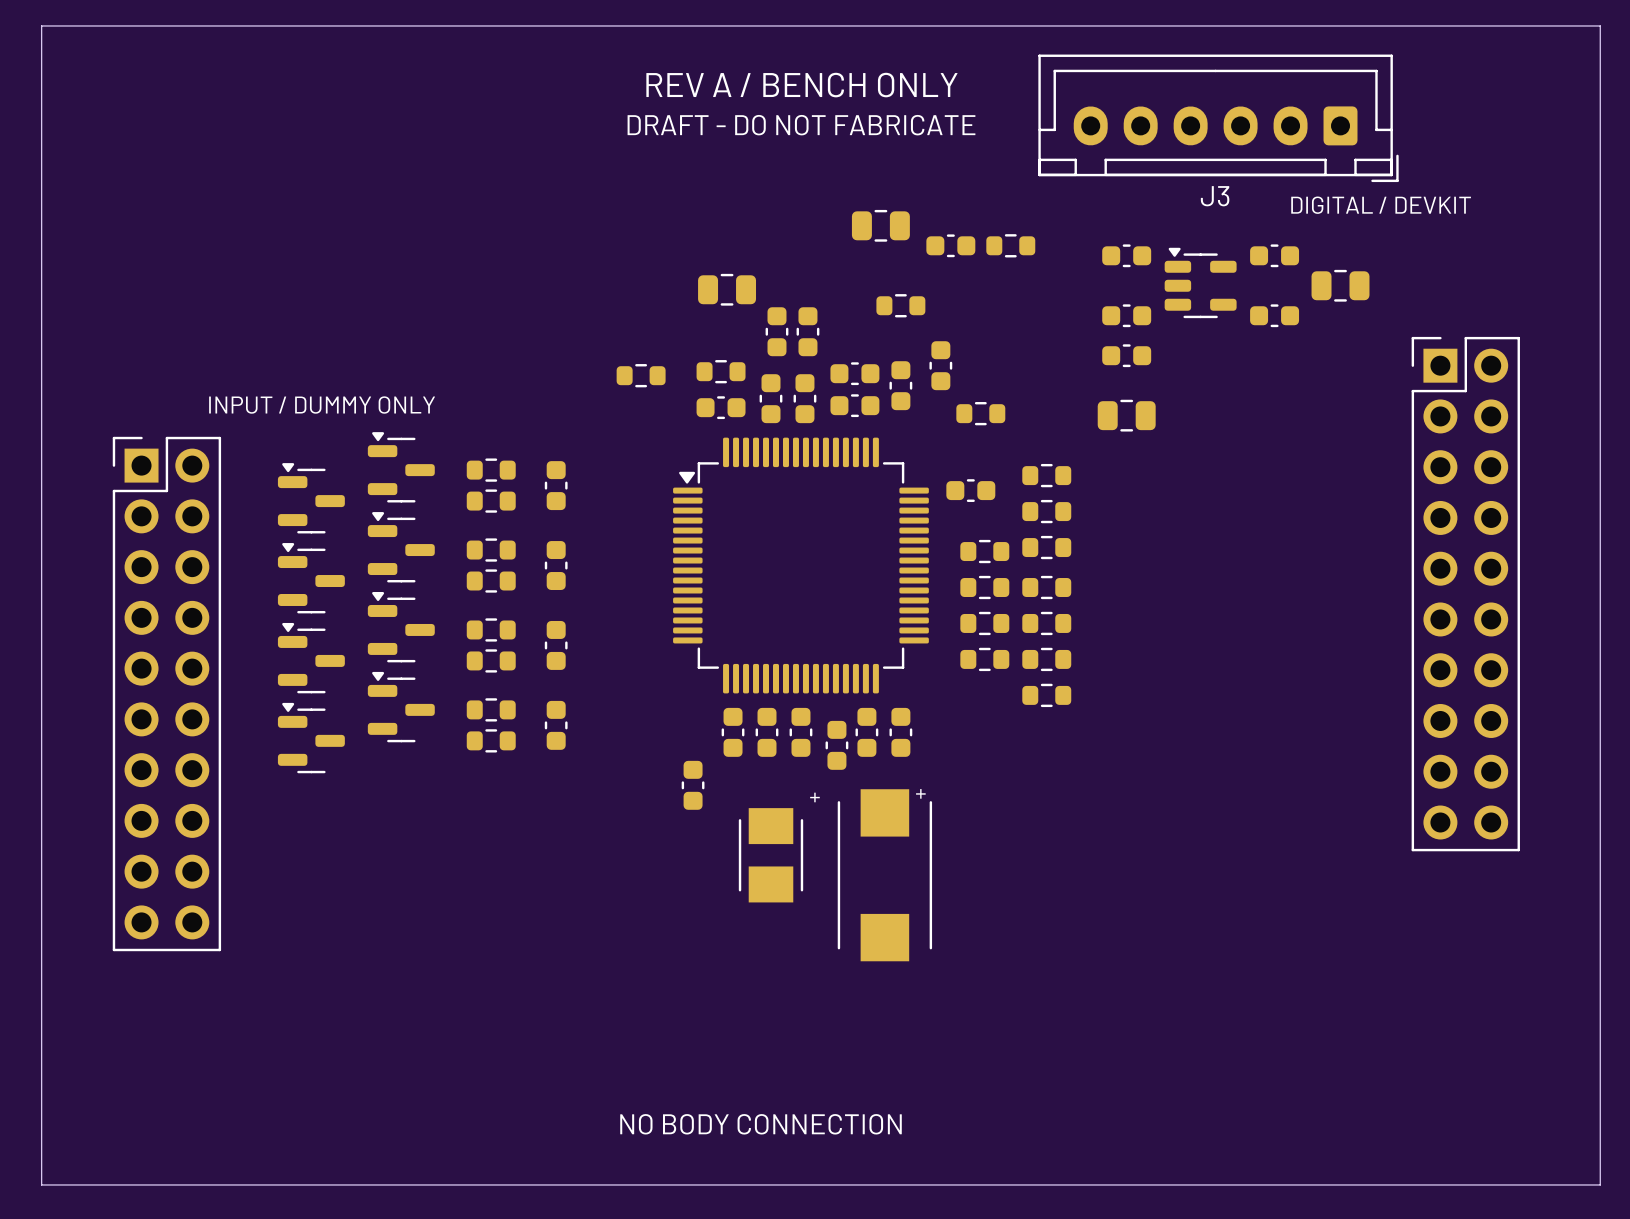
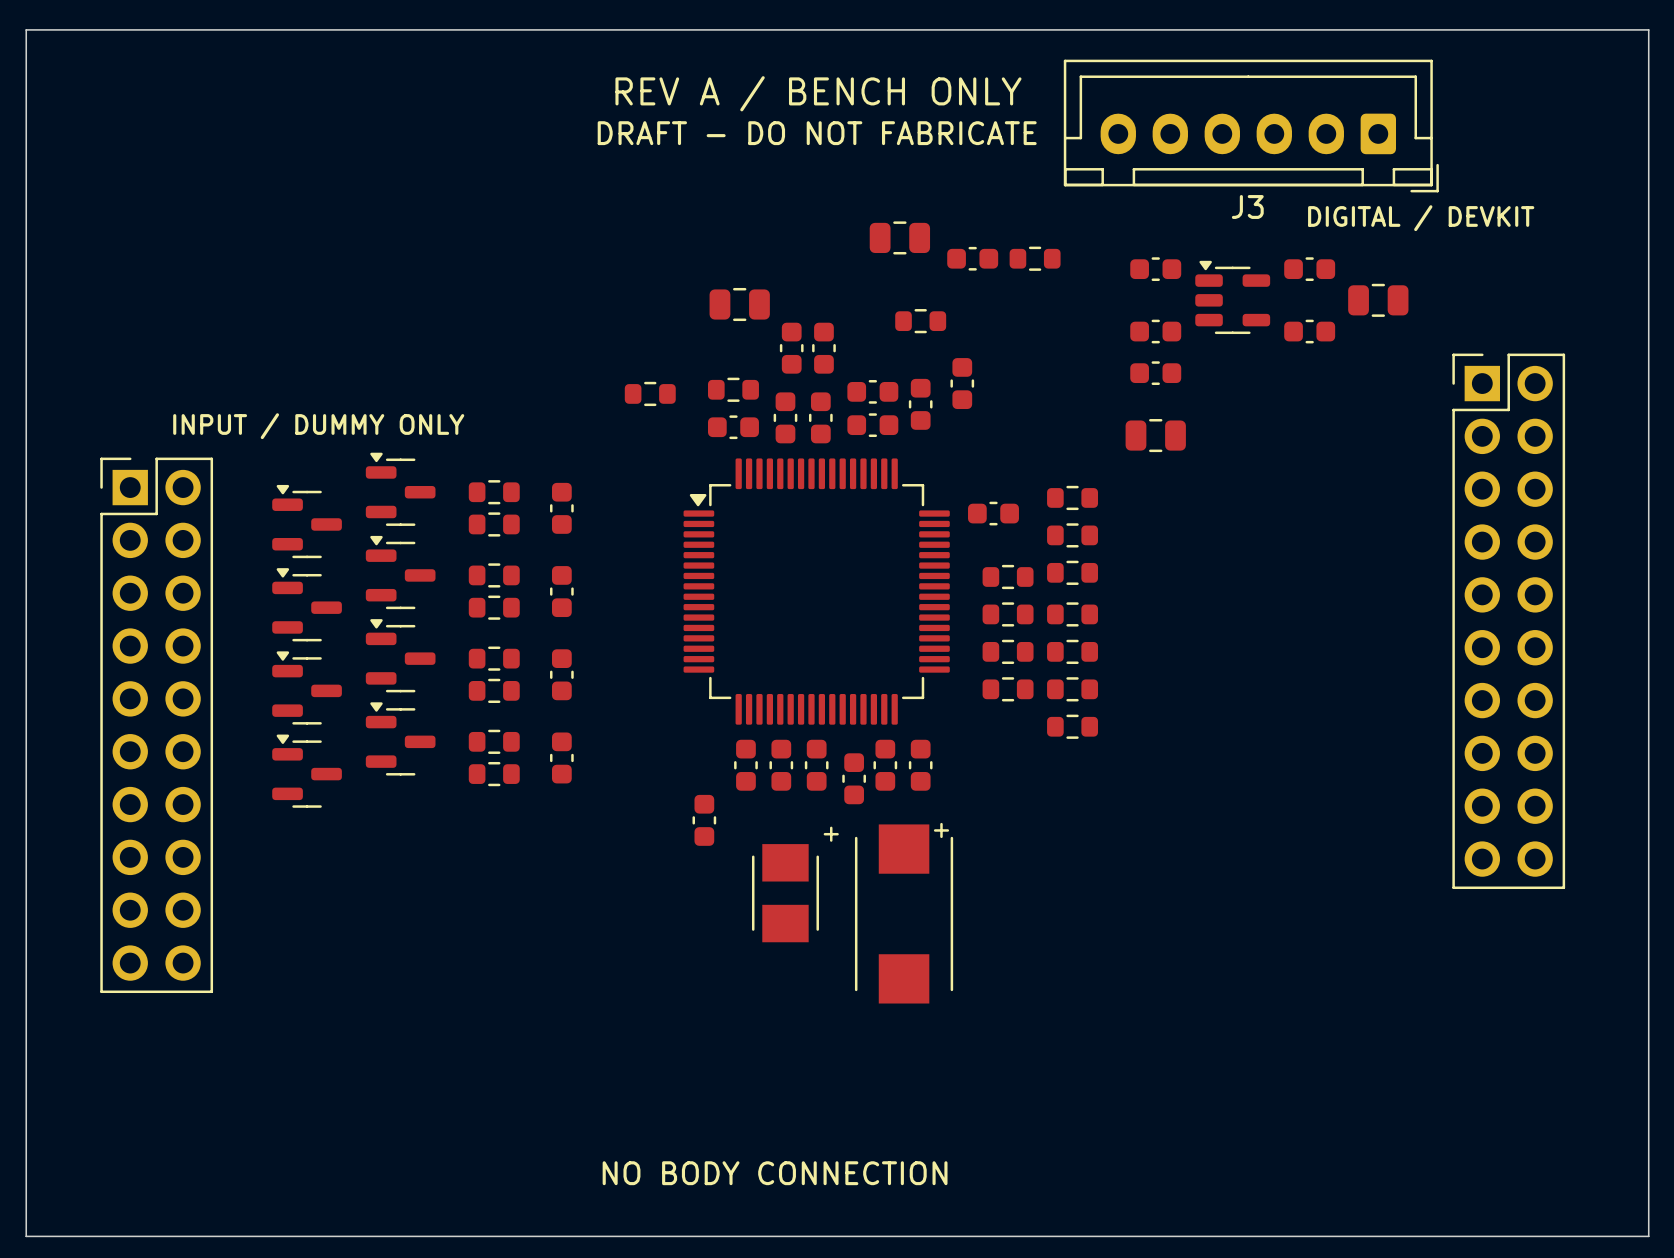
part: (980, 413) -> none

